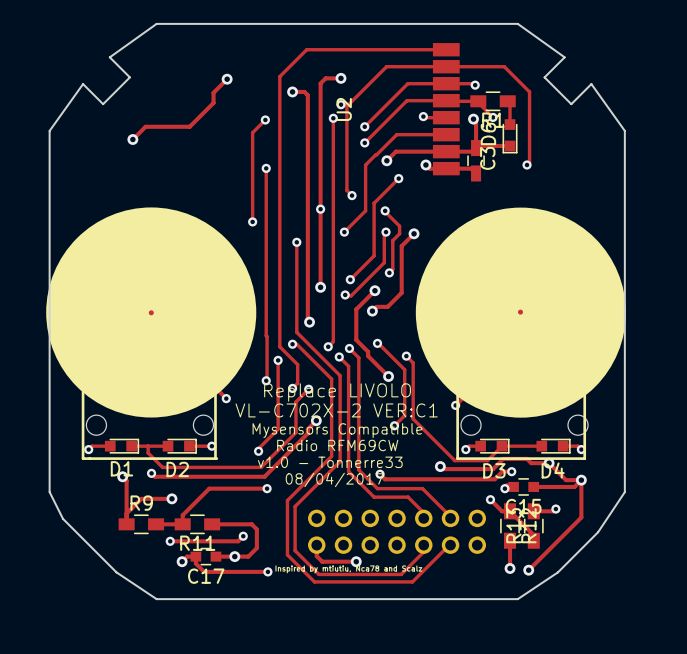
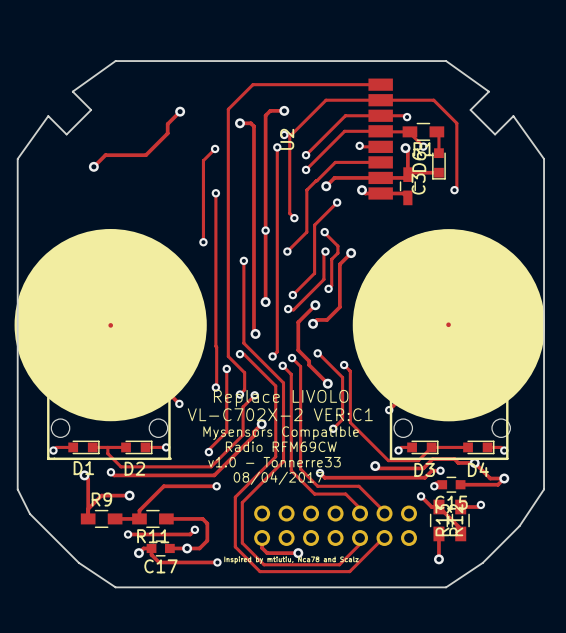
track: (581, 480) (581, 517) (528, 570) -> none
via: (528, 570) -> none

